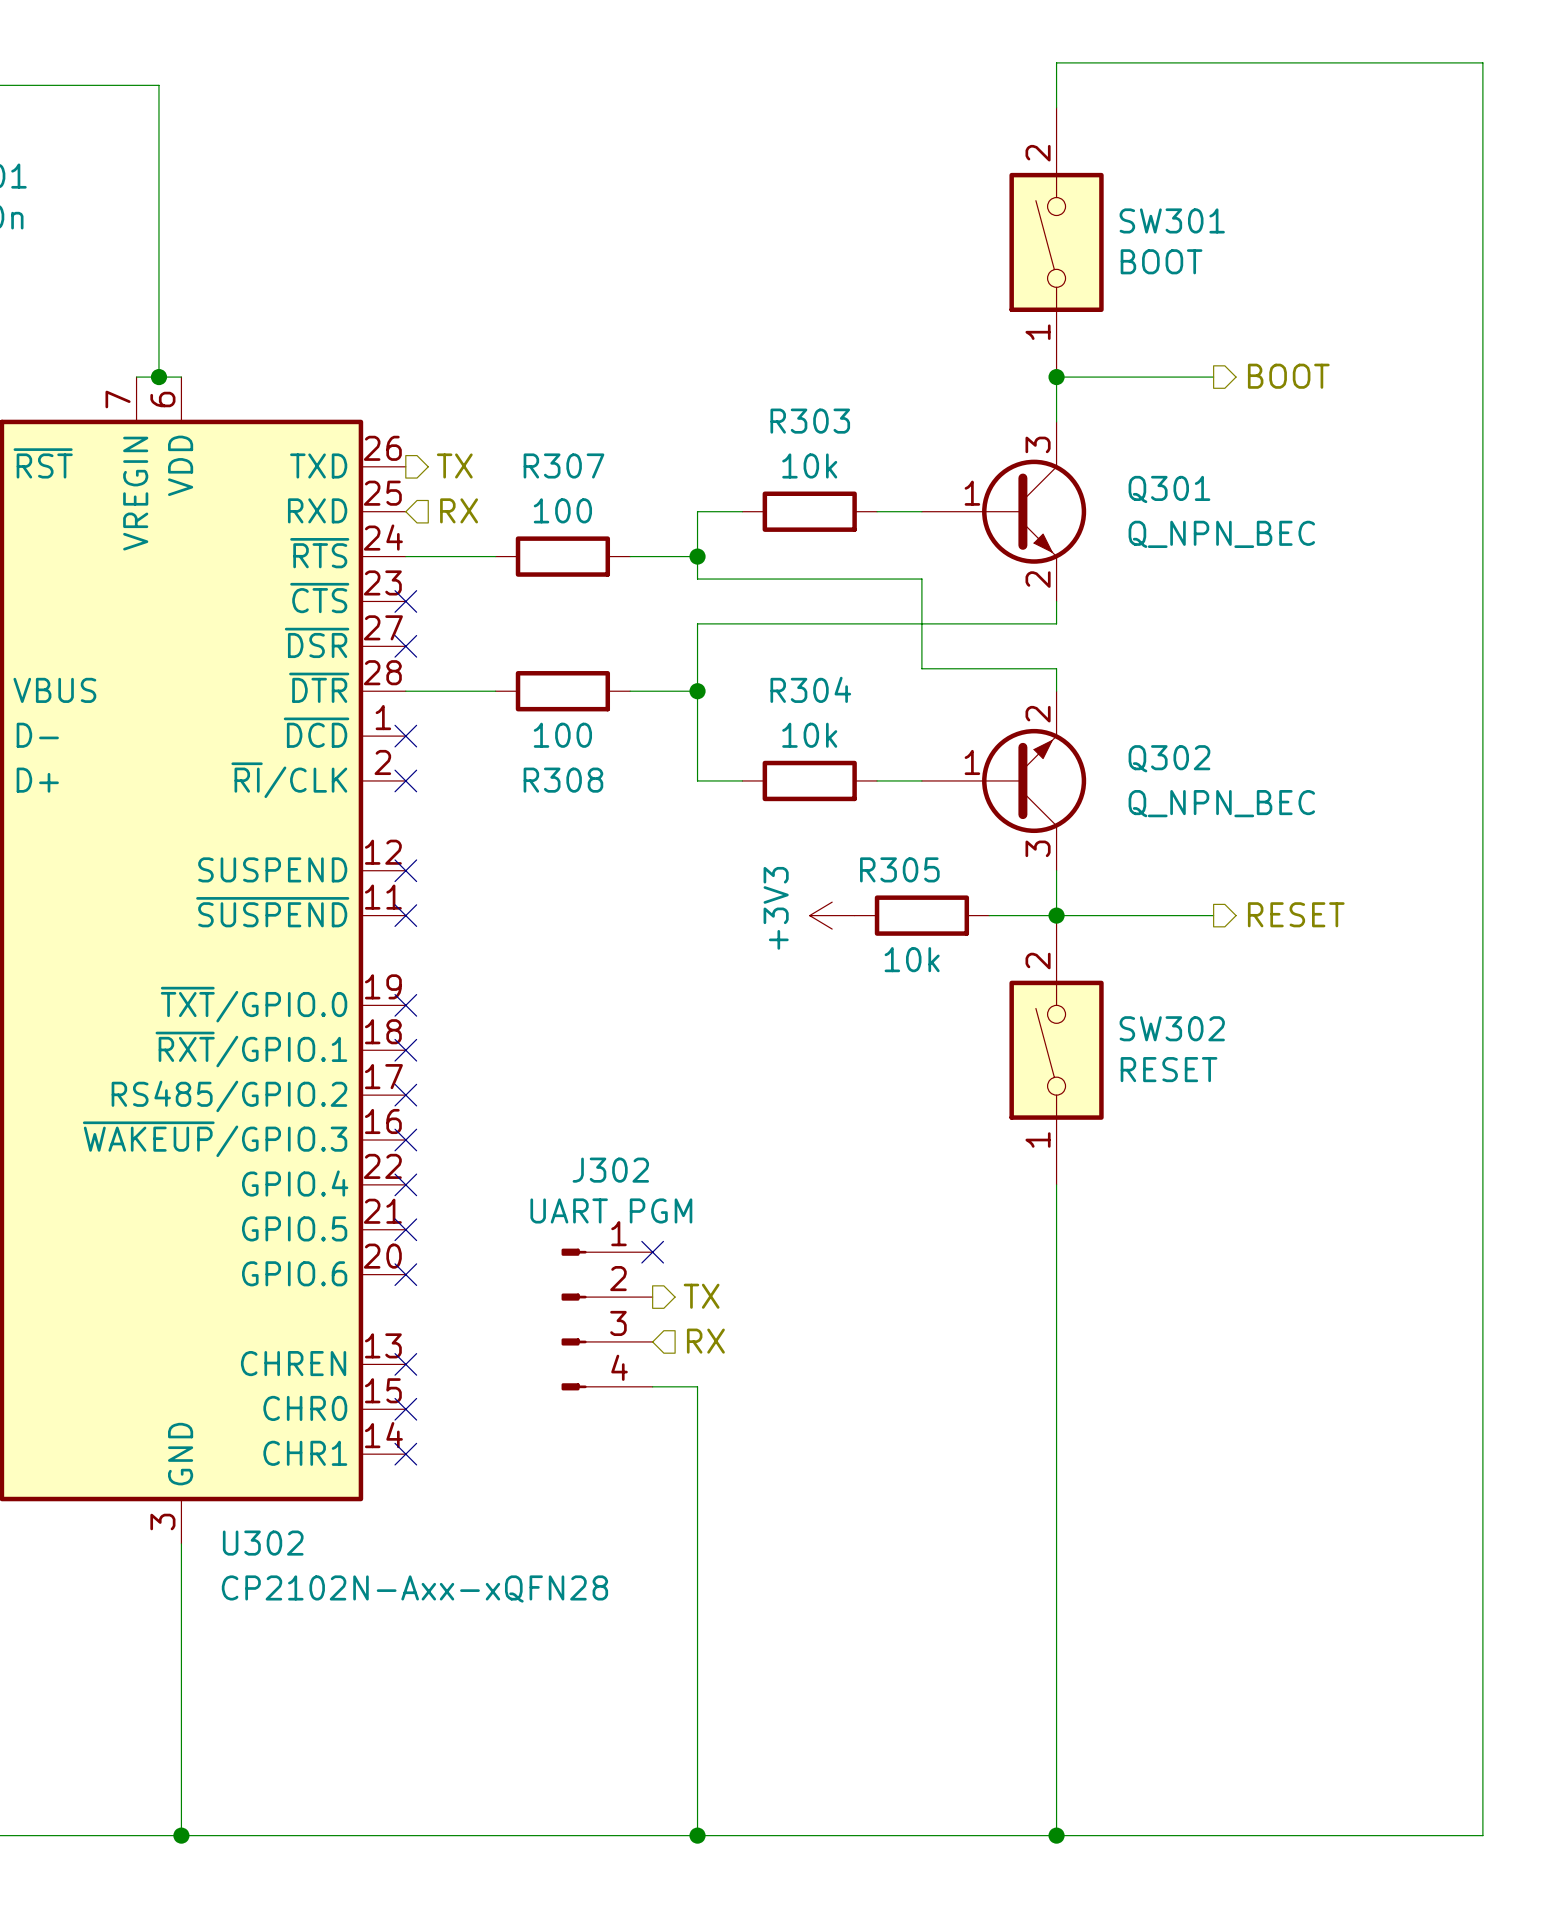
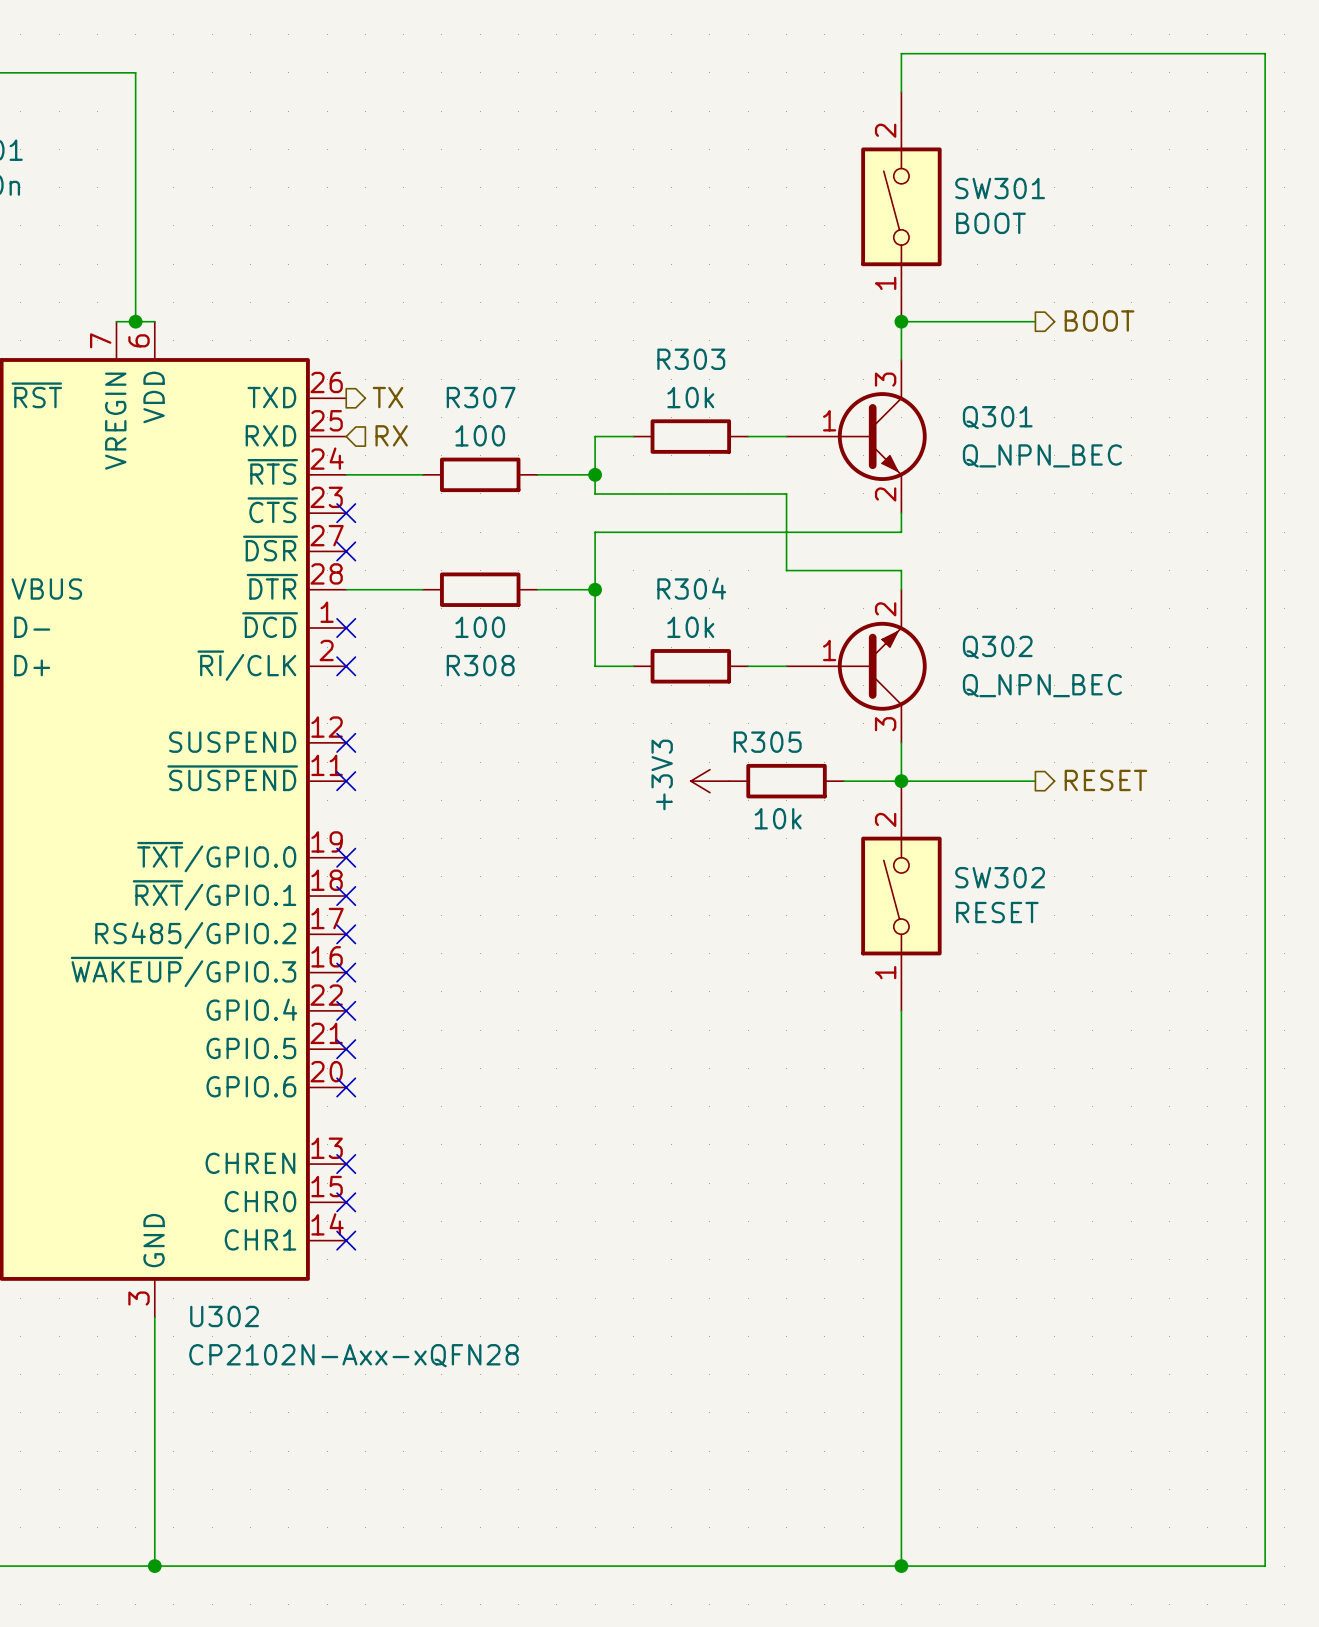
no-connect mark: (652, 1252) -> none
hierarchical label: TX (701, 1296) -> none
J302: UART PGM (607, 1319) -> none
hierarchical label: RX (705, 1341) -> none
wire: (652, 1386) (697, 1386) (697, 1835) -> none
junction: (697, 1835) -> none

